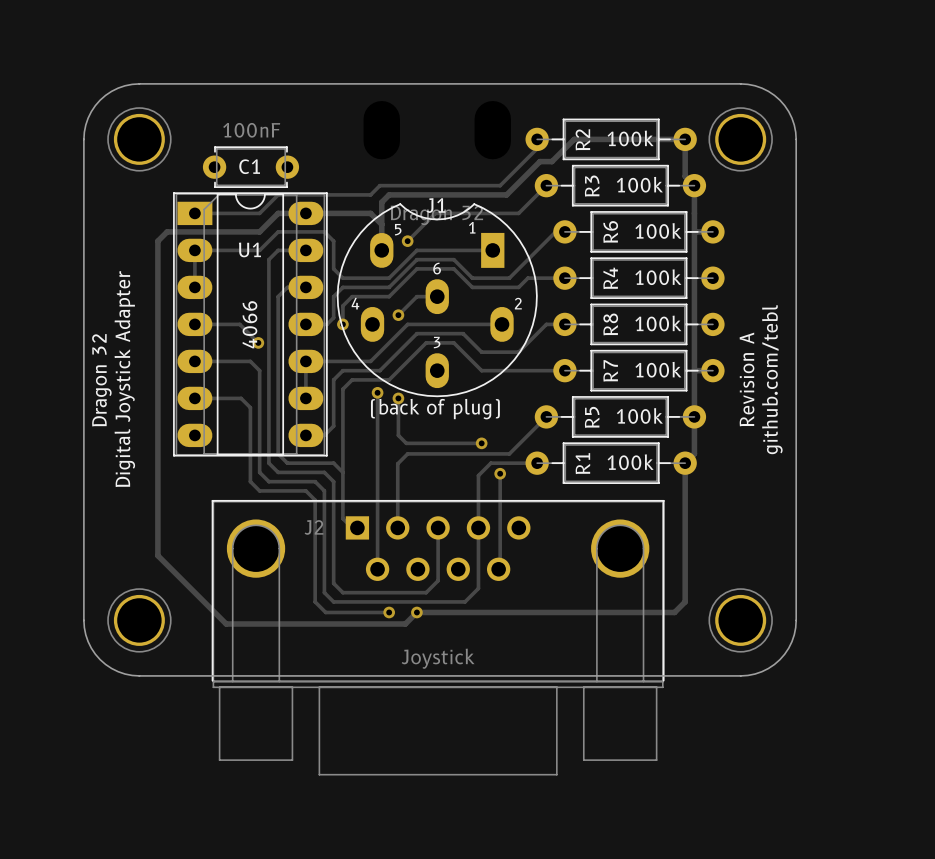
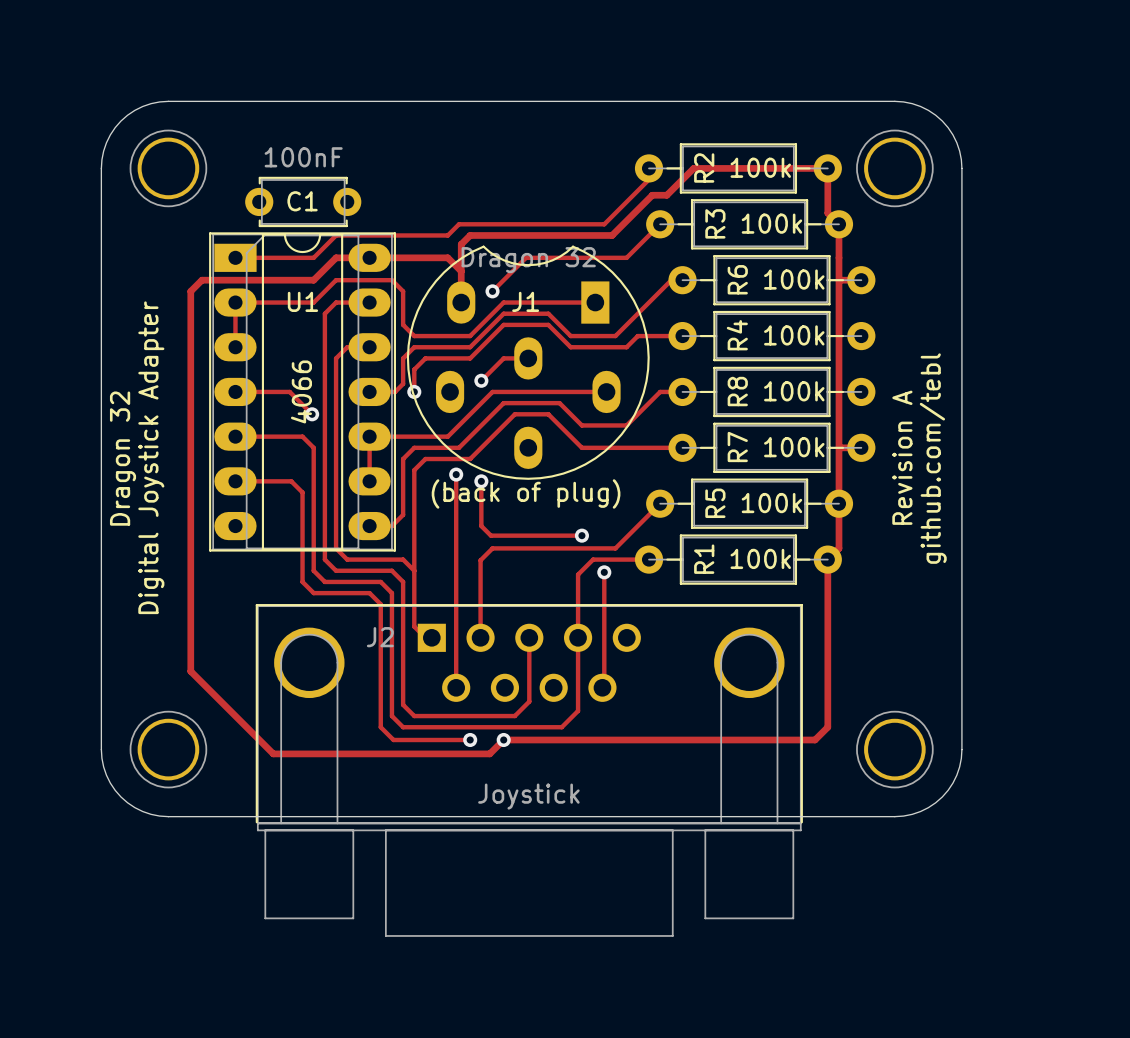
J1 name position: J1 (436, 205) -> J1 (525, 301)
text: 1 (472, 227) -> none
text: 5 (398, 229) -> none
text: 6 (437, 268) -> none
text: 4 (355, 303) -> none
text: 2 (518, 303) -> none
text: 3 (437, 342) -> none

